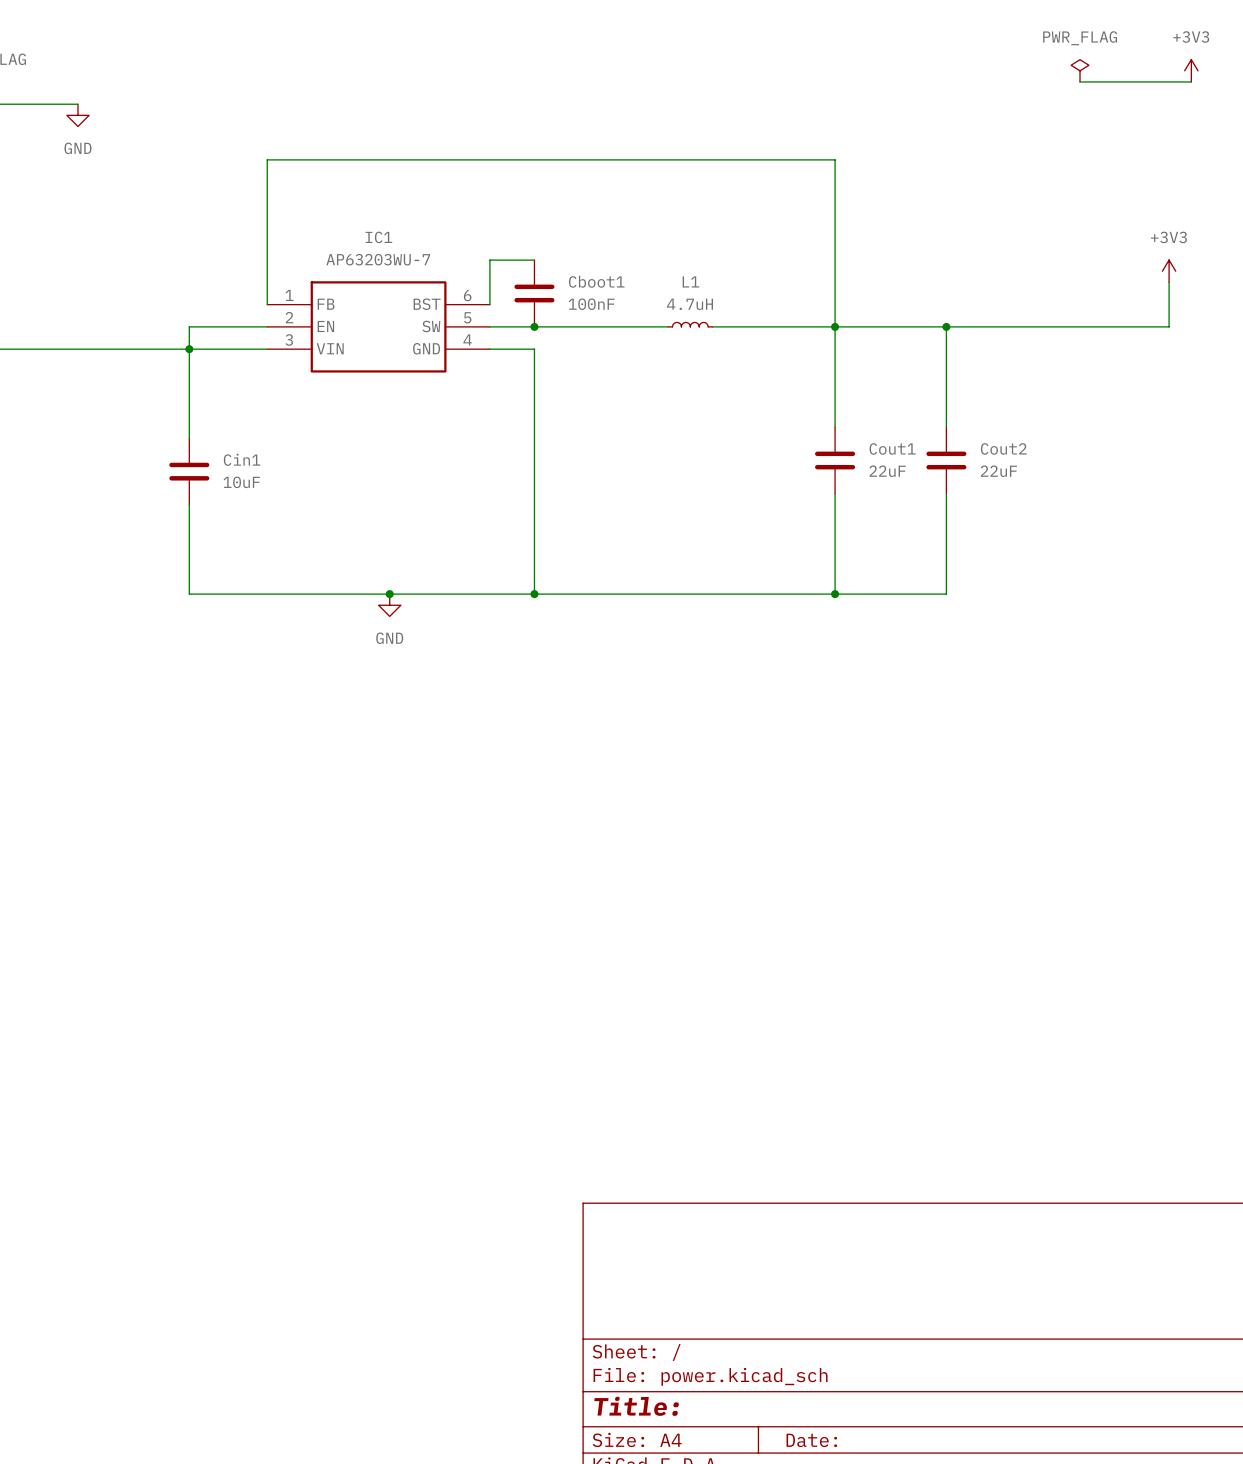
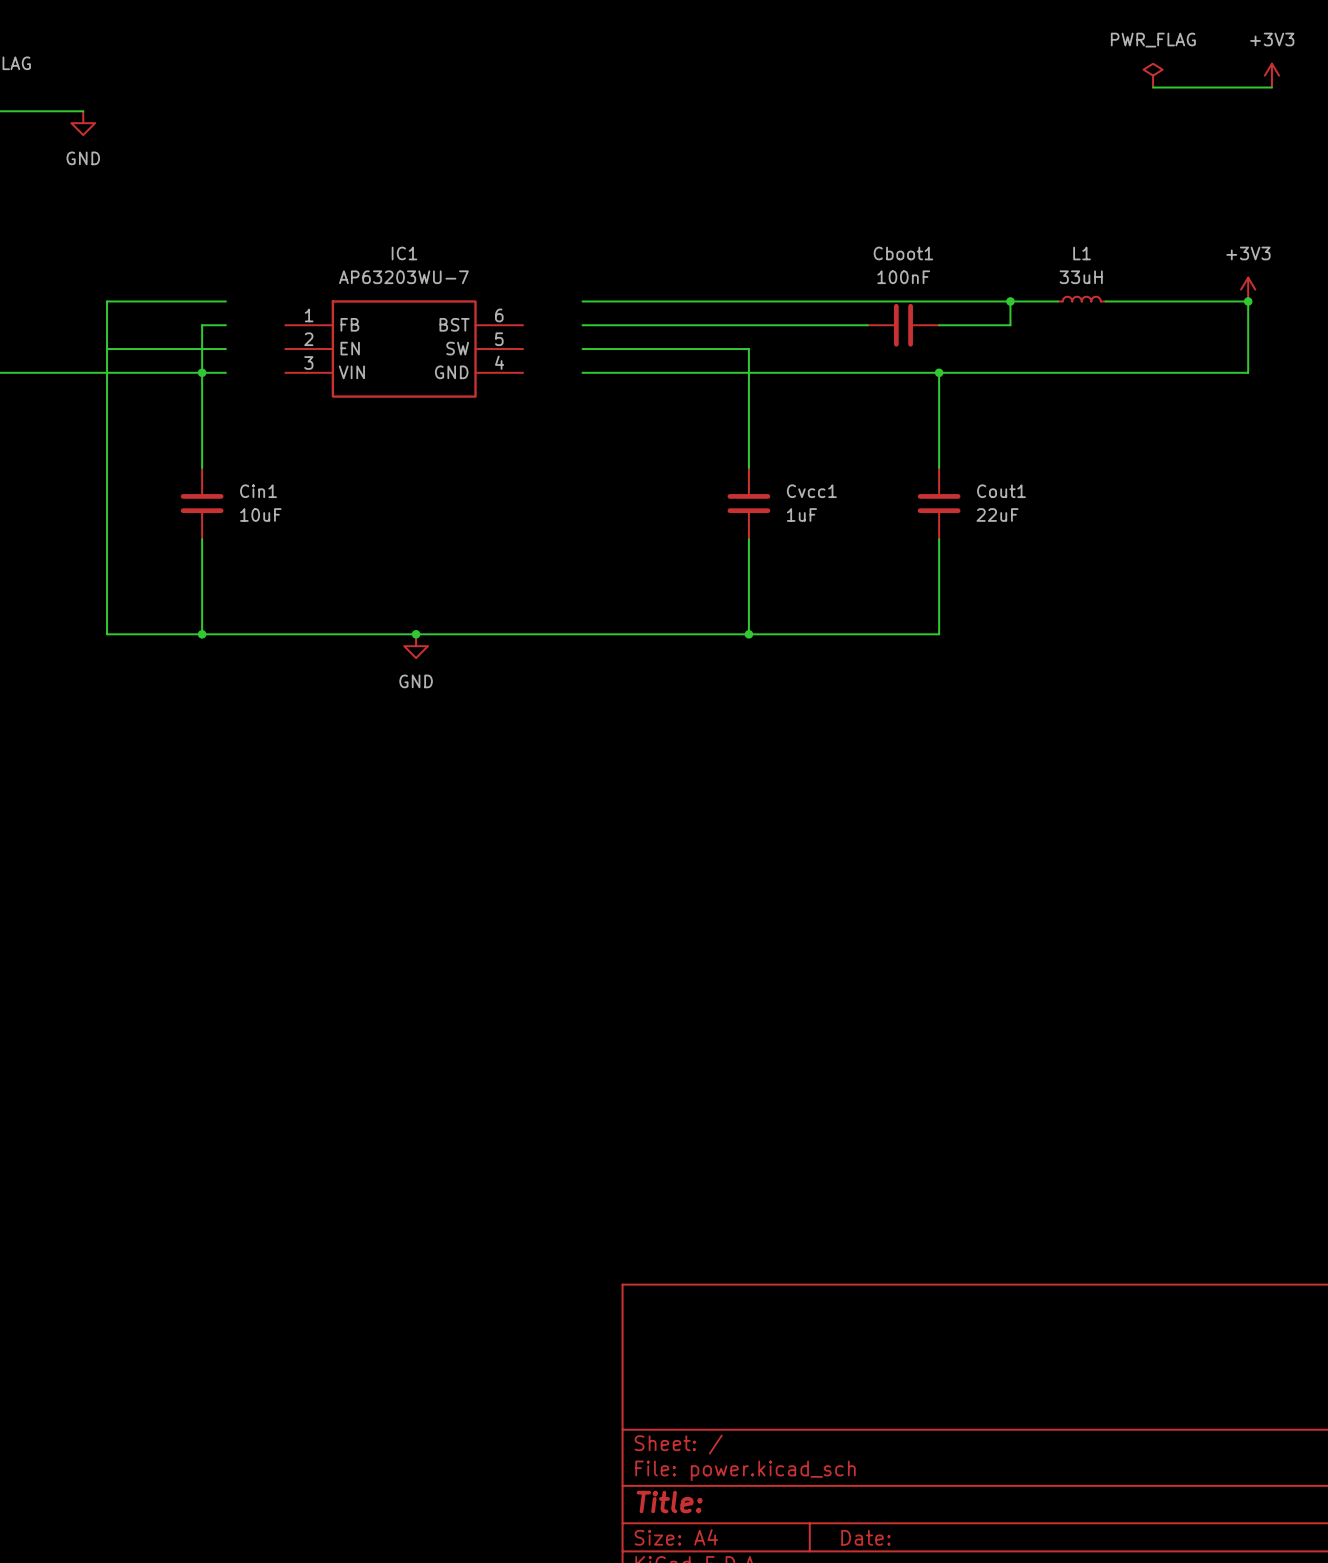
wire: (534, 260) (489, 260) (489, 304) -> none
Cboot1 name position: Cboot1 (596, 281) -> Cboot1 (903, 253)
wire: none -> (225, 301) (107, 301) (107, 634) (202, 634)
wire: none -> (582, 301) (1057, 301)
wire: none -> (1010, 301) (1010, 325) (939, 325)
junction: none -> (1010, 301)
wire: none -> (1105, 301) (1248, 301)
junction: none -> (1248, 301)
Cboot1 rotation: 0° (534, 293) -> 90° clockwise (903, 325)
Cboot1 position: (534, 293) -> (903, 325)
wire: none -> (225, 325) (202, 325) (202, 349) (107, 349)
wire: (267, 304) (267, 159) (835, 159) (835, 427) -> none
wire: none -> (582, 325) (867, 325)
Cboot1 value position: 100nF (591, 304) -> 100nF (903, 277)
L1 value: 4.7uH (689, 304) -> 33uH (1081, 277)
L1 position: (690, 324) -> (1081, 299)
wire: (211, 326) (267, 326) -> none
wire: (489, 326) (545, 326) -> none
junction: (534, 326) -> none
wire: none -> (713, 349) (748, 349) (748, 467)
wire: (712, 326) (1169, 326) -> (582, 372) (1248, 372) (1248, 349)
junction: (835, 326) -> none
wire: (946, 326) (946, 427) -> none
junction: (946, 326) -> none
wire: (211, 349) (267, 349) -> none
wire: (489, 349) (534, 349) (534, 594) -> none
wire: none -> (939, 372) (939, 467)
junction: none -> (939, 372)
Cout1 position: (835, 460) -> (939, 503)
Cout2: 22uF (946, 460) -> none
Cvcc1: none -> 1uF (748, 503)
wire: (835, 493) (835, 594) -> none
wire: (946, 493) (946, 594) (879, 594) -> (939, 539) (939, 634)
wire: none -> (748, 539) (748, 634)
junction: none -> (202, 634)
junction: (534, 594) -> none
junction: none -> (748, 634)
junction: (835, 594) -> none

